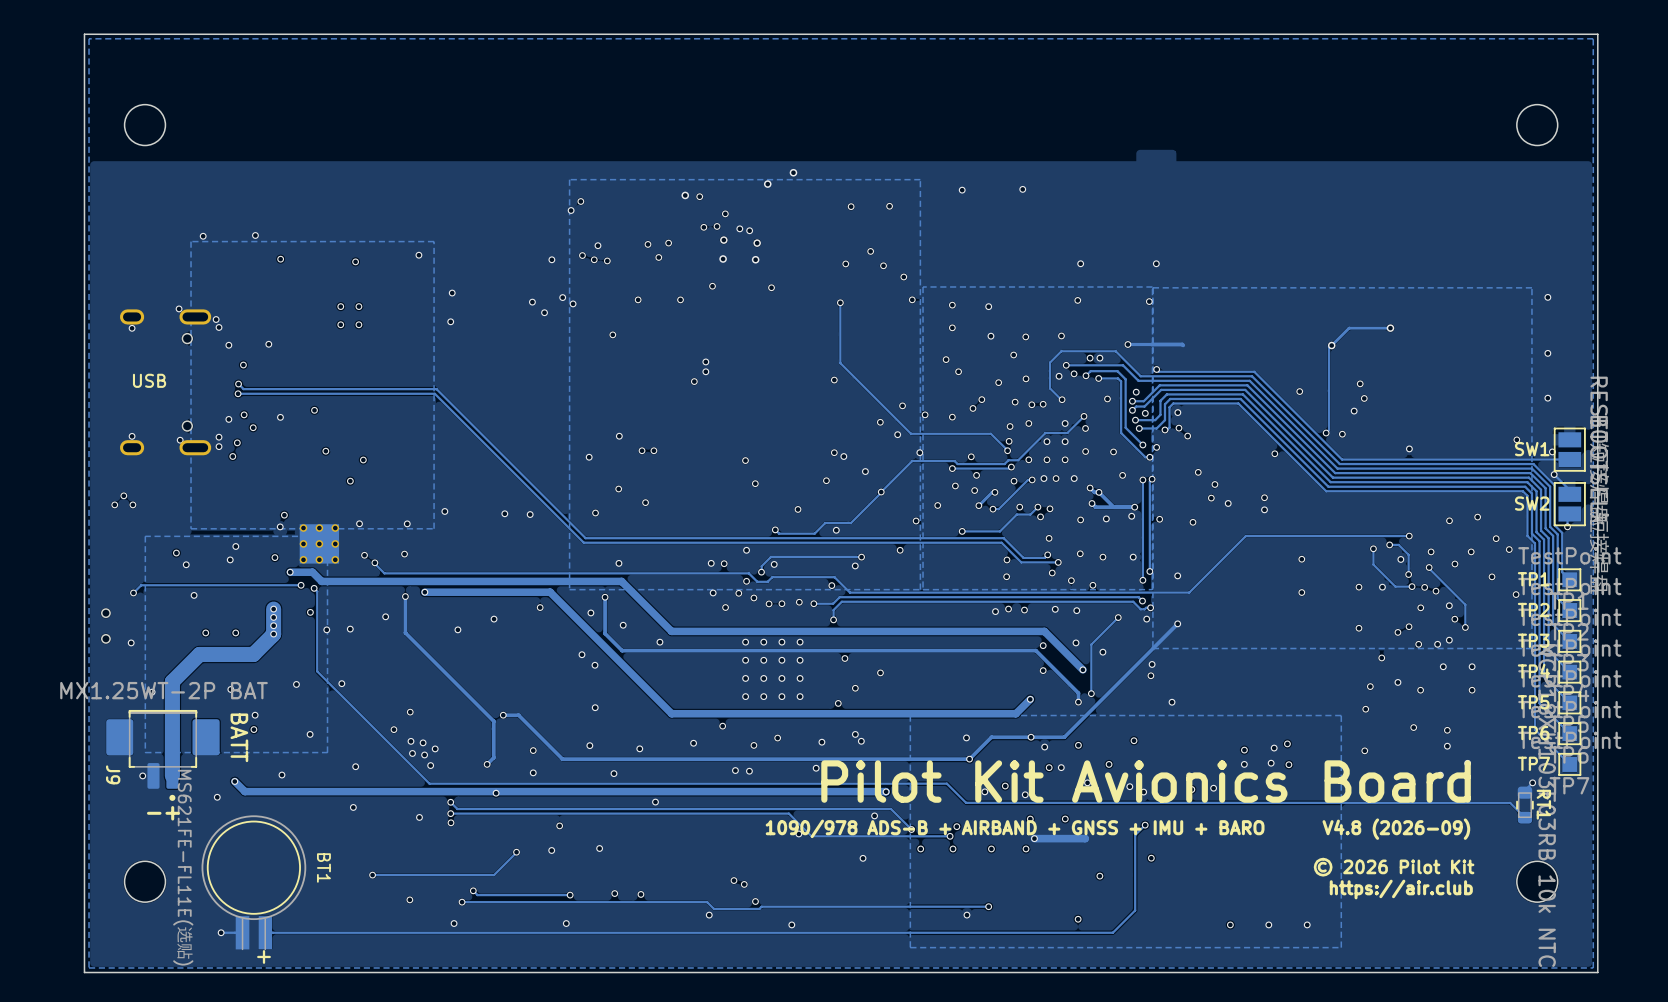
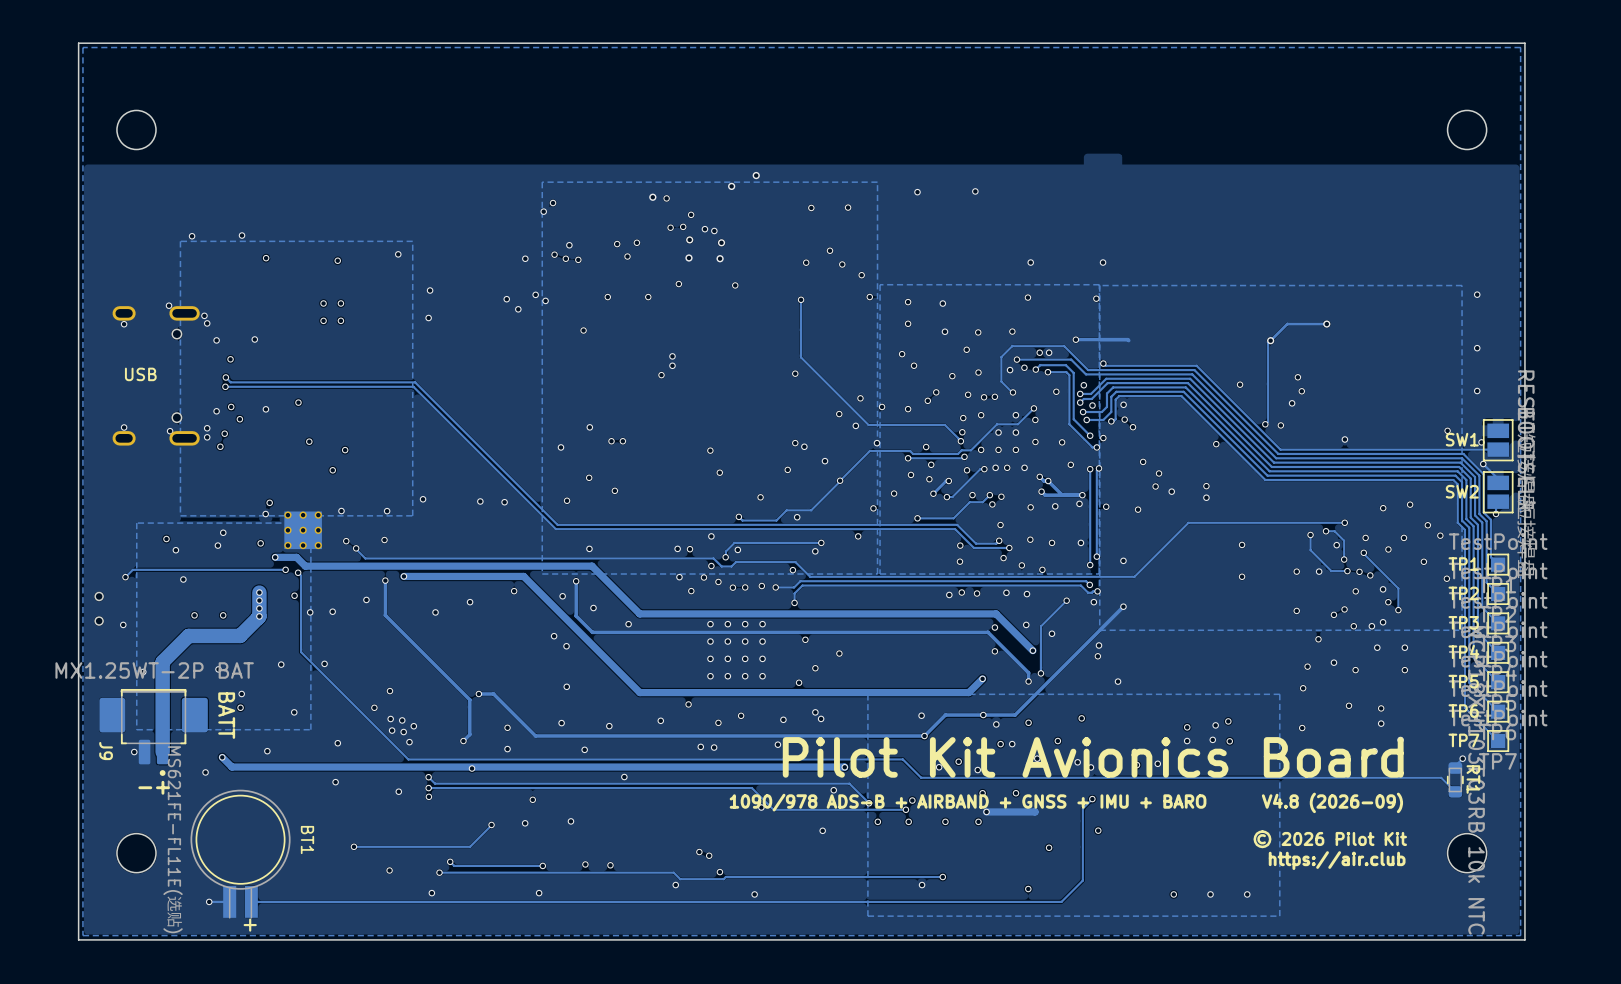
via: (123, 495) -> none
via: (114, 504) -> none
via: (132, 504) -> none

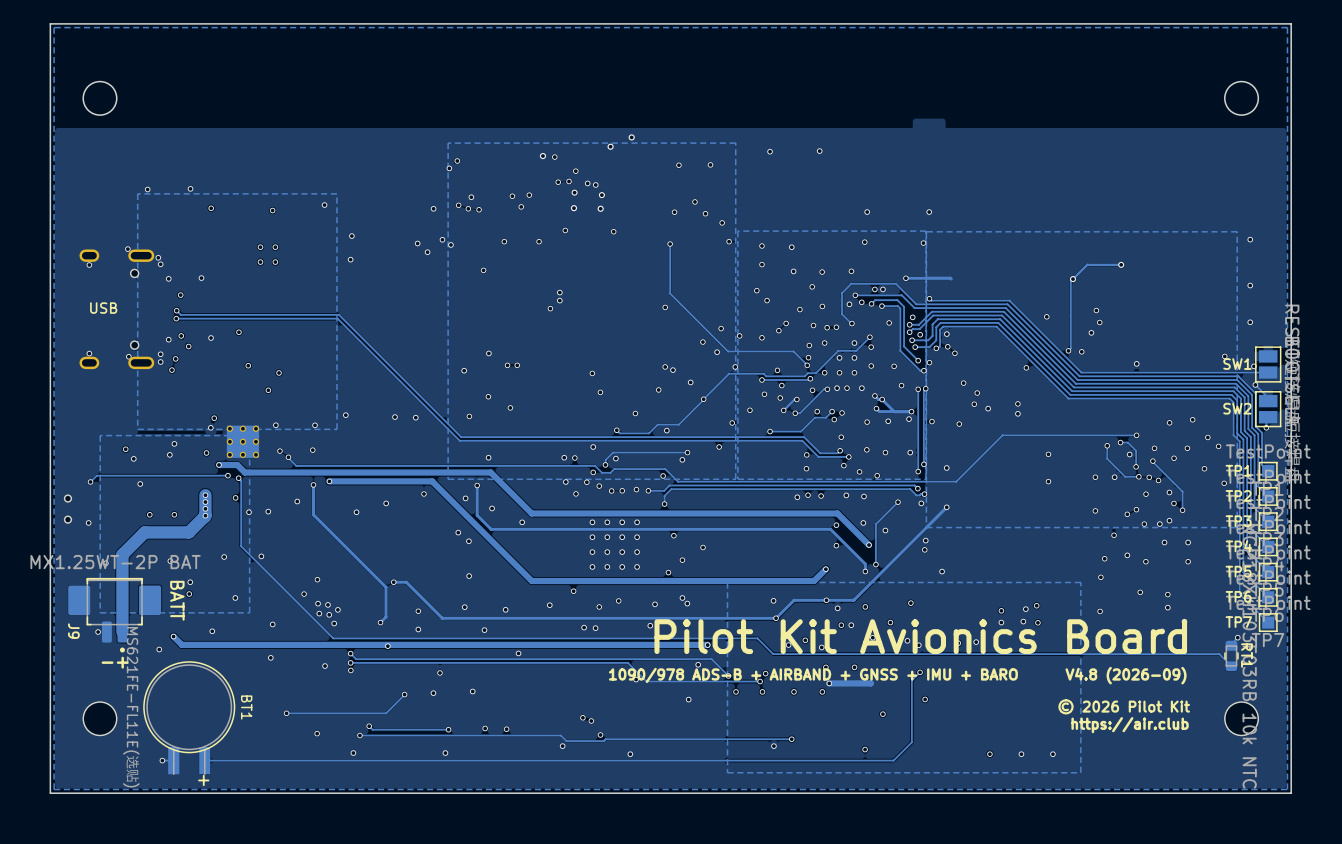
BT1 footprint: [190, 789, 291, 919] -> [143, 661, 236, 775]

